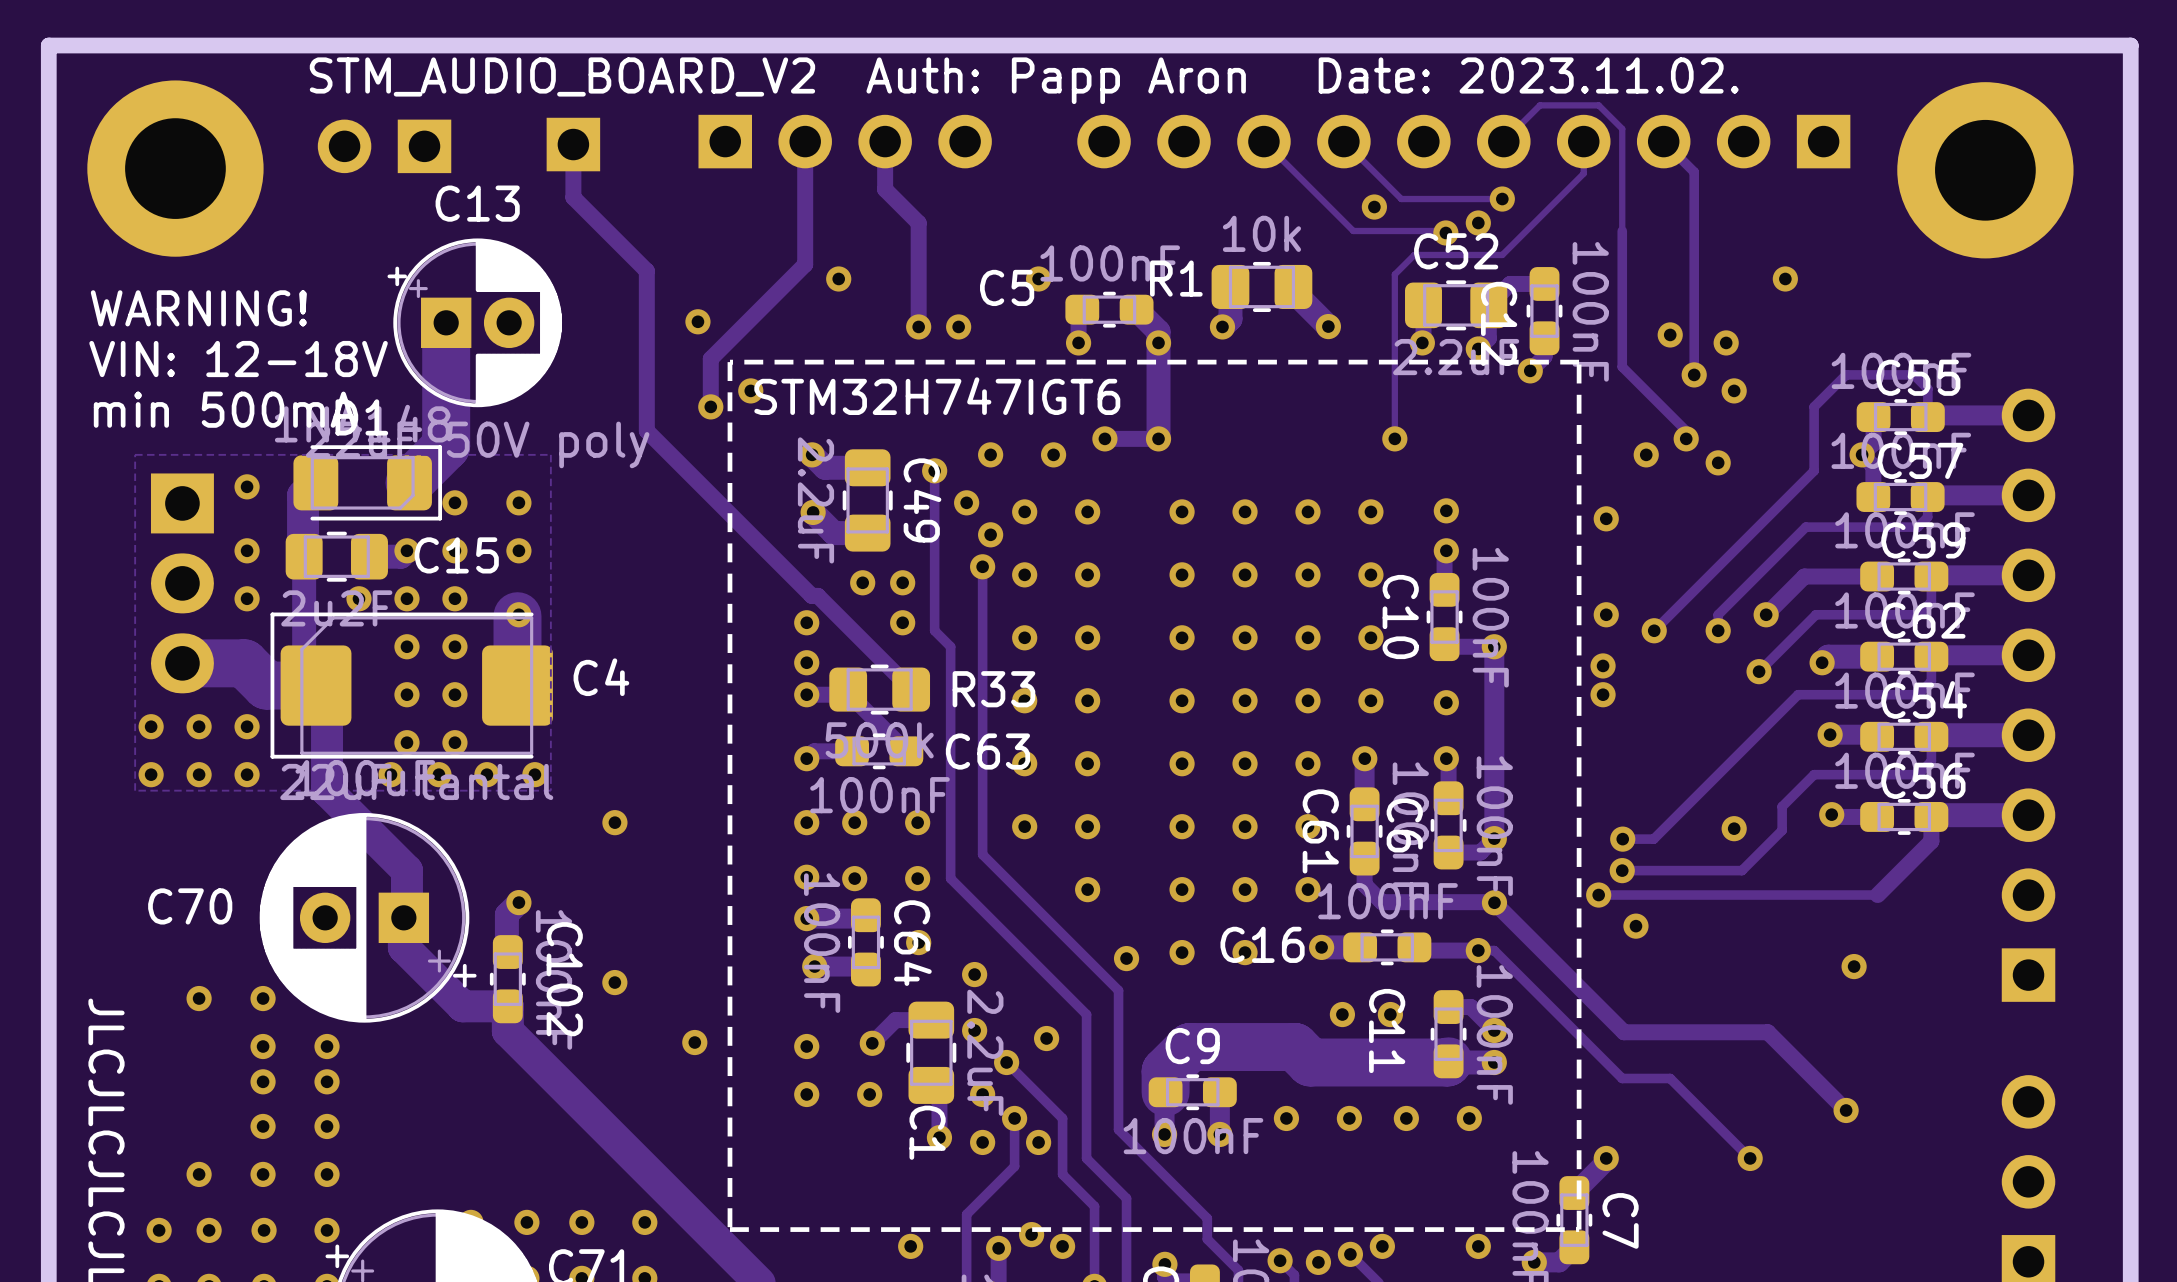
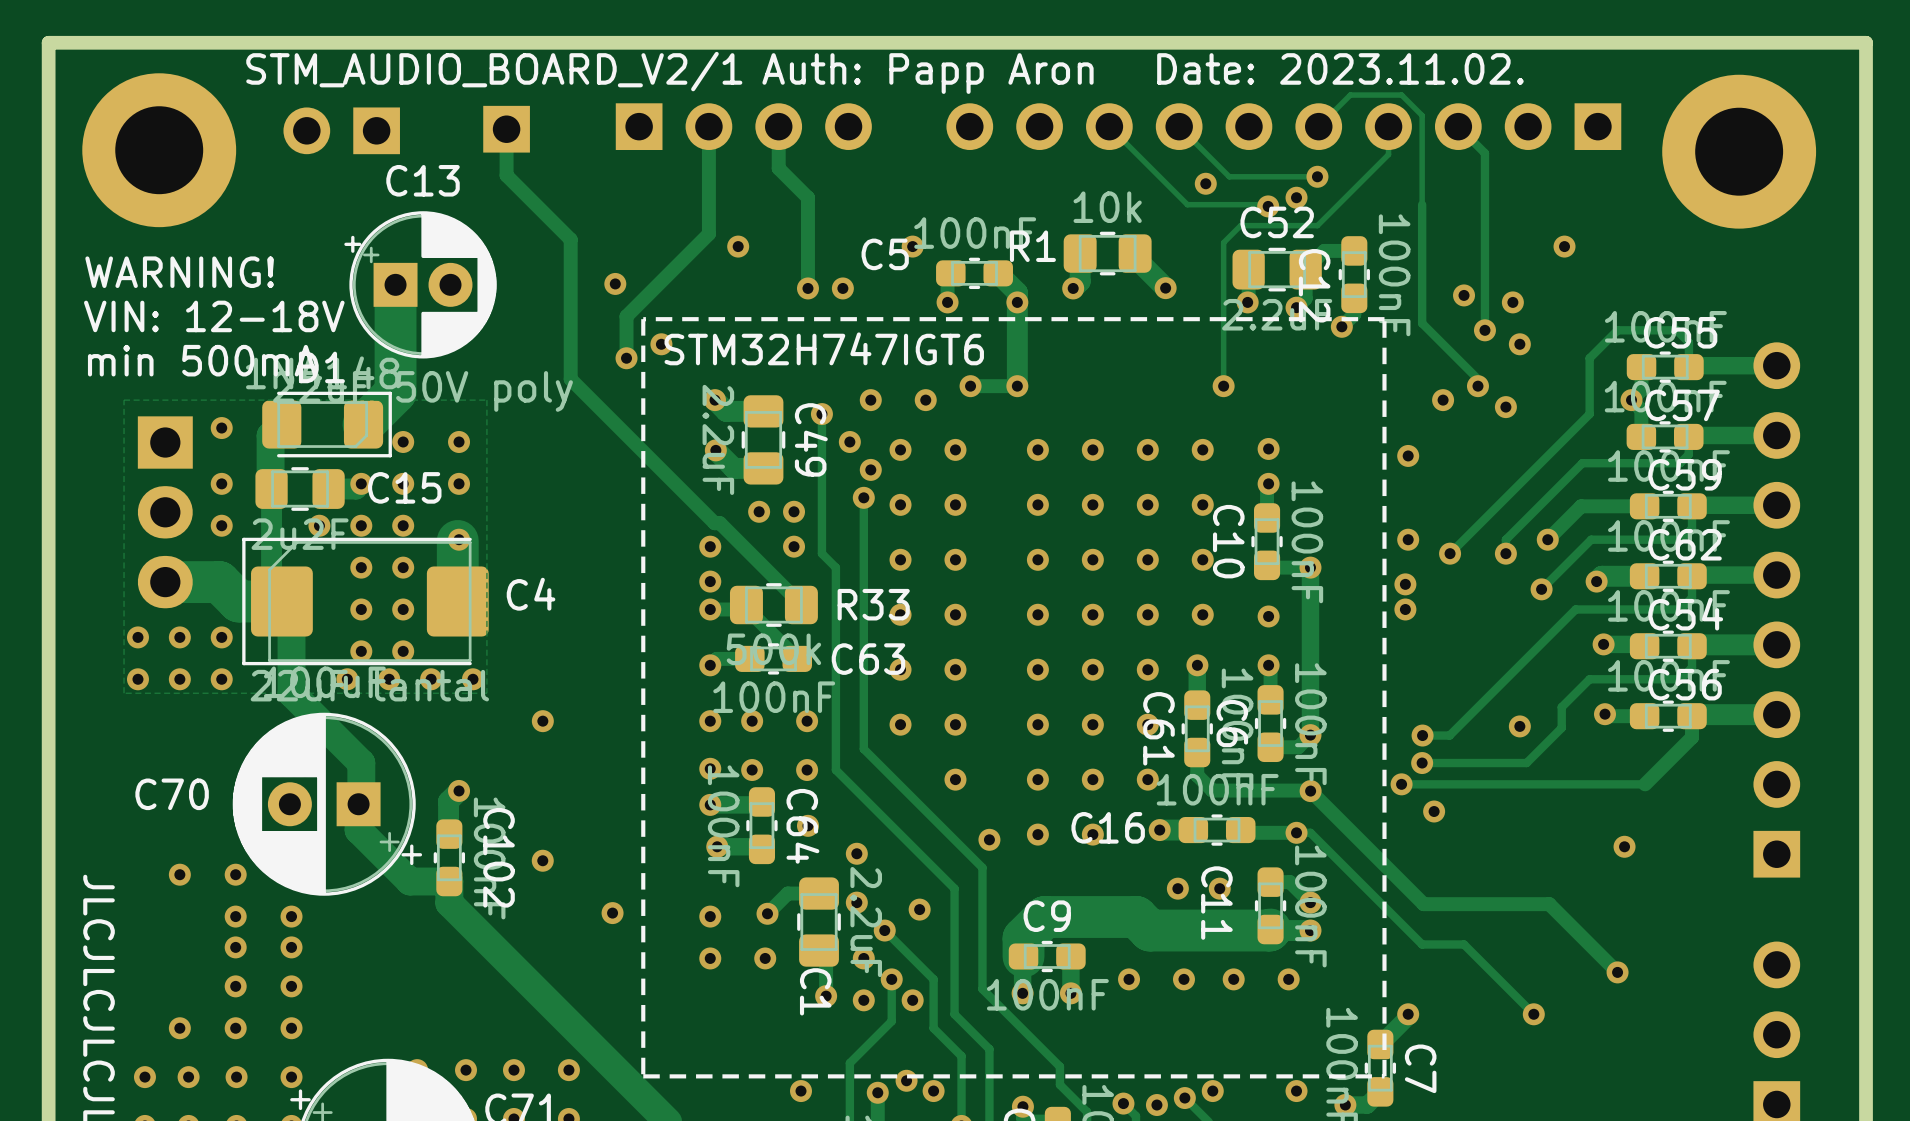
text: STM_AUDIO_BOARD_V2 (562, 76) -> STM_AUDIO_BOARD_V2/1 (494, 71)

